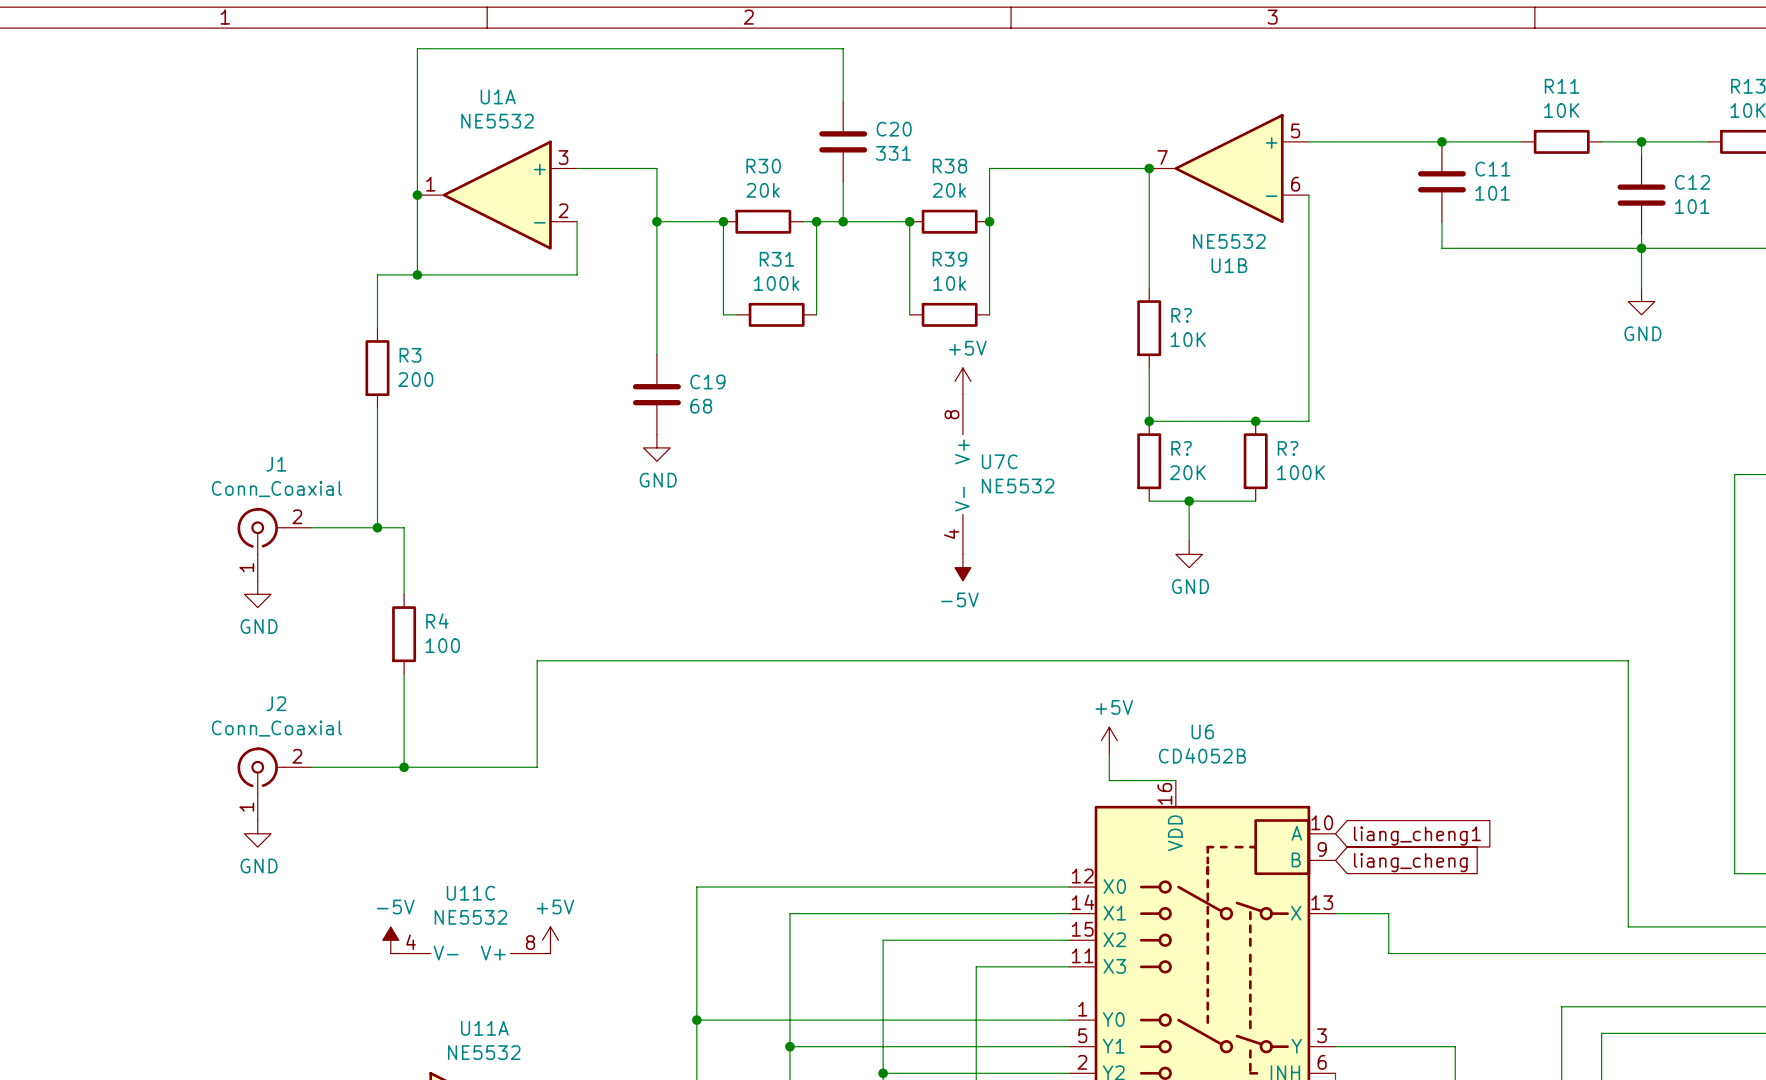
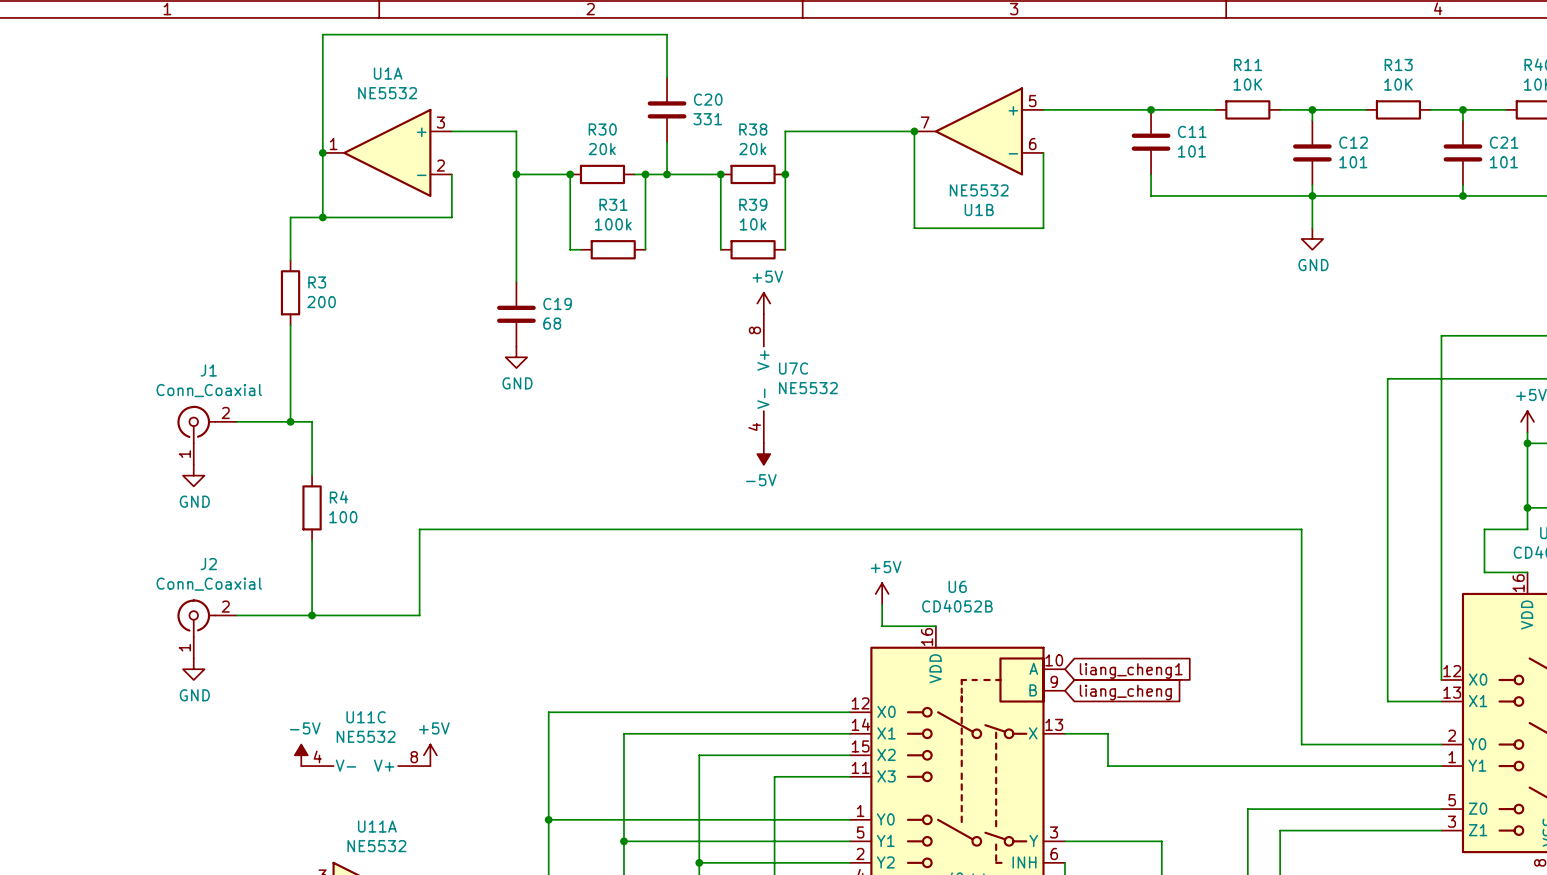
wire: (1308, 288) (1308, 421) (1149, 421) (1149, 368) -> (1043, 228) (914, 228)
R?: 10K (1149, 328) -> none
junction: (1149, 421) -> none
junction: (1255, 421) -> none
R?: 20K (1149, 461) -> none
R?: 100K (1255, 461) -> none
wire: (1149, 501) (1255, 501) -> none
wire: (1189, 501) (1189, 541) -> none
junction: (1189, 501) -> none
power symbol: GND (1189, 554) -> none

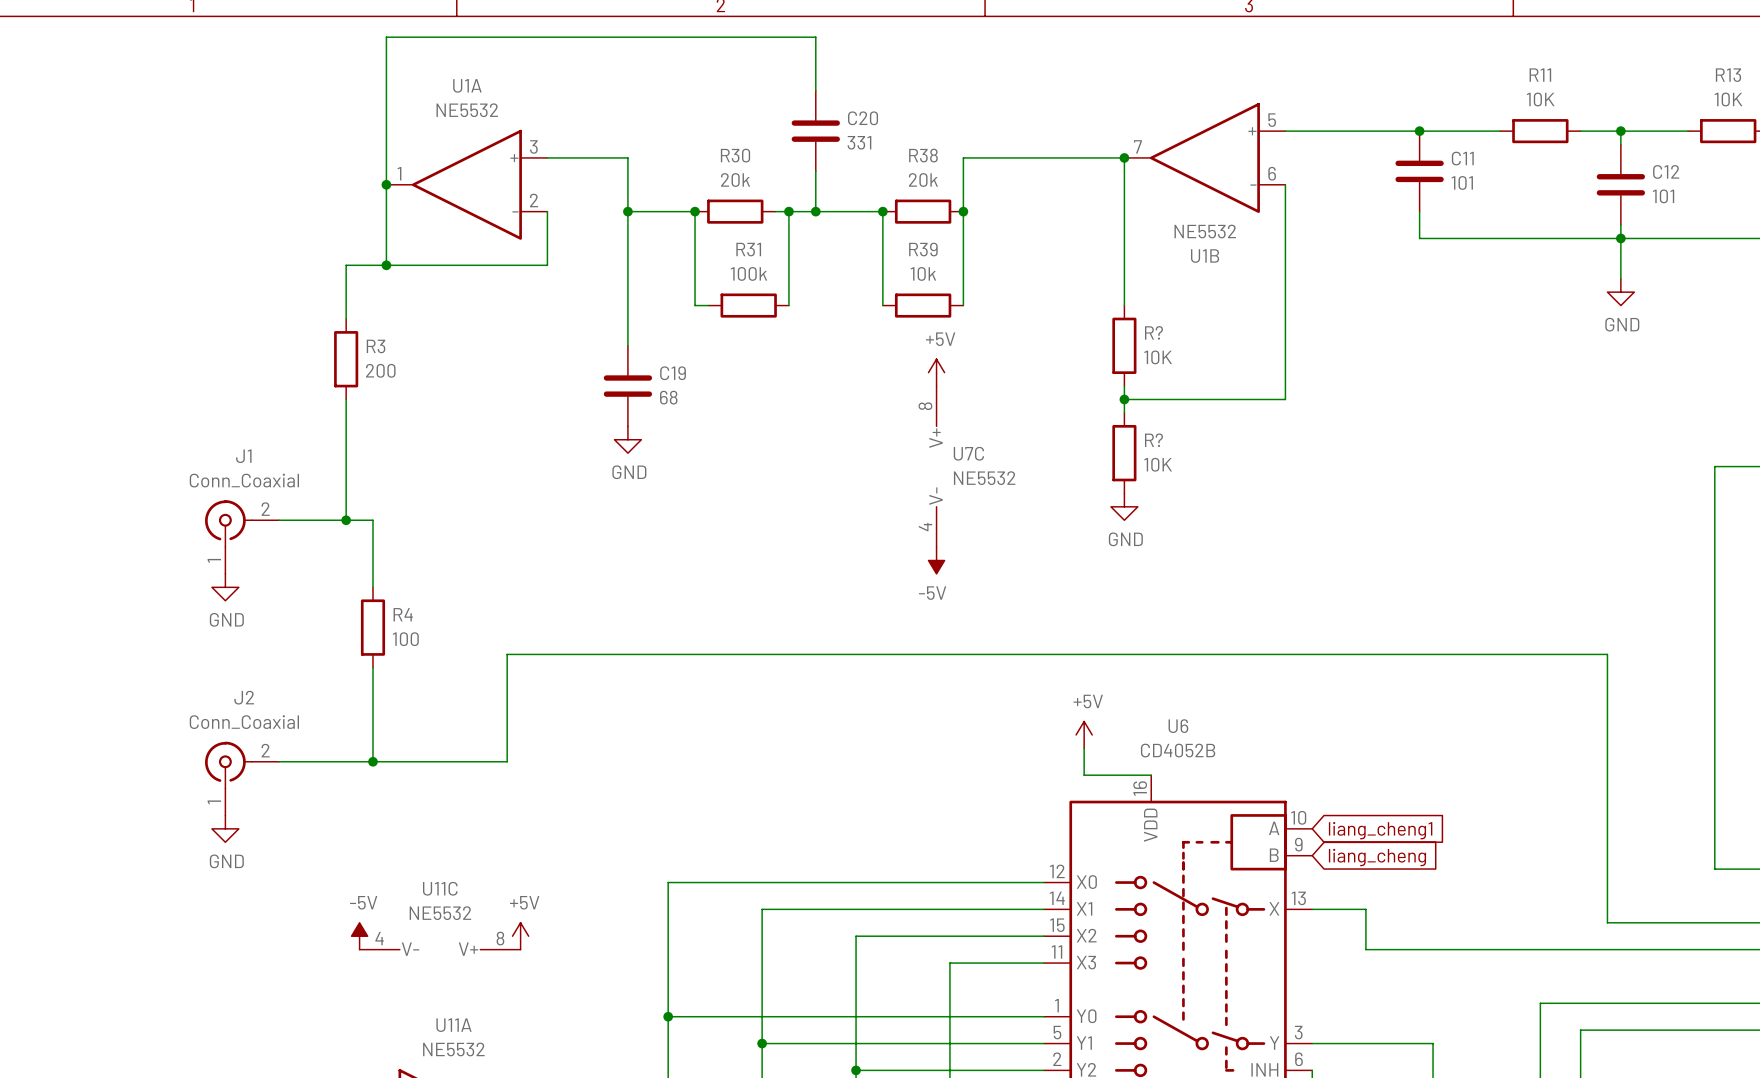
wire: (914, 228) (1043, 228) -> (1124, 399) (1285, 399) (1285, 278)
wire: none -> (1124, 278) (1124, 305)
R?: none -> 10K (1124, 345)
wire: none -> (1124, 386) (1124, 412)
junction: none -> (1124, 399)
R?: none -> 10K (1124, 453)
power symbol: none -> GND (1124, 506)

